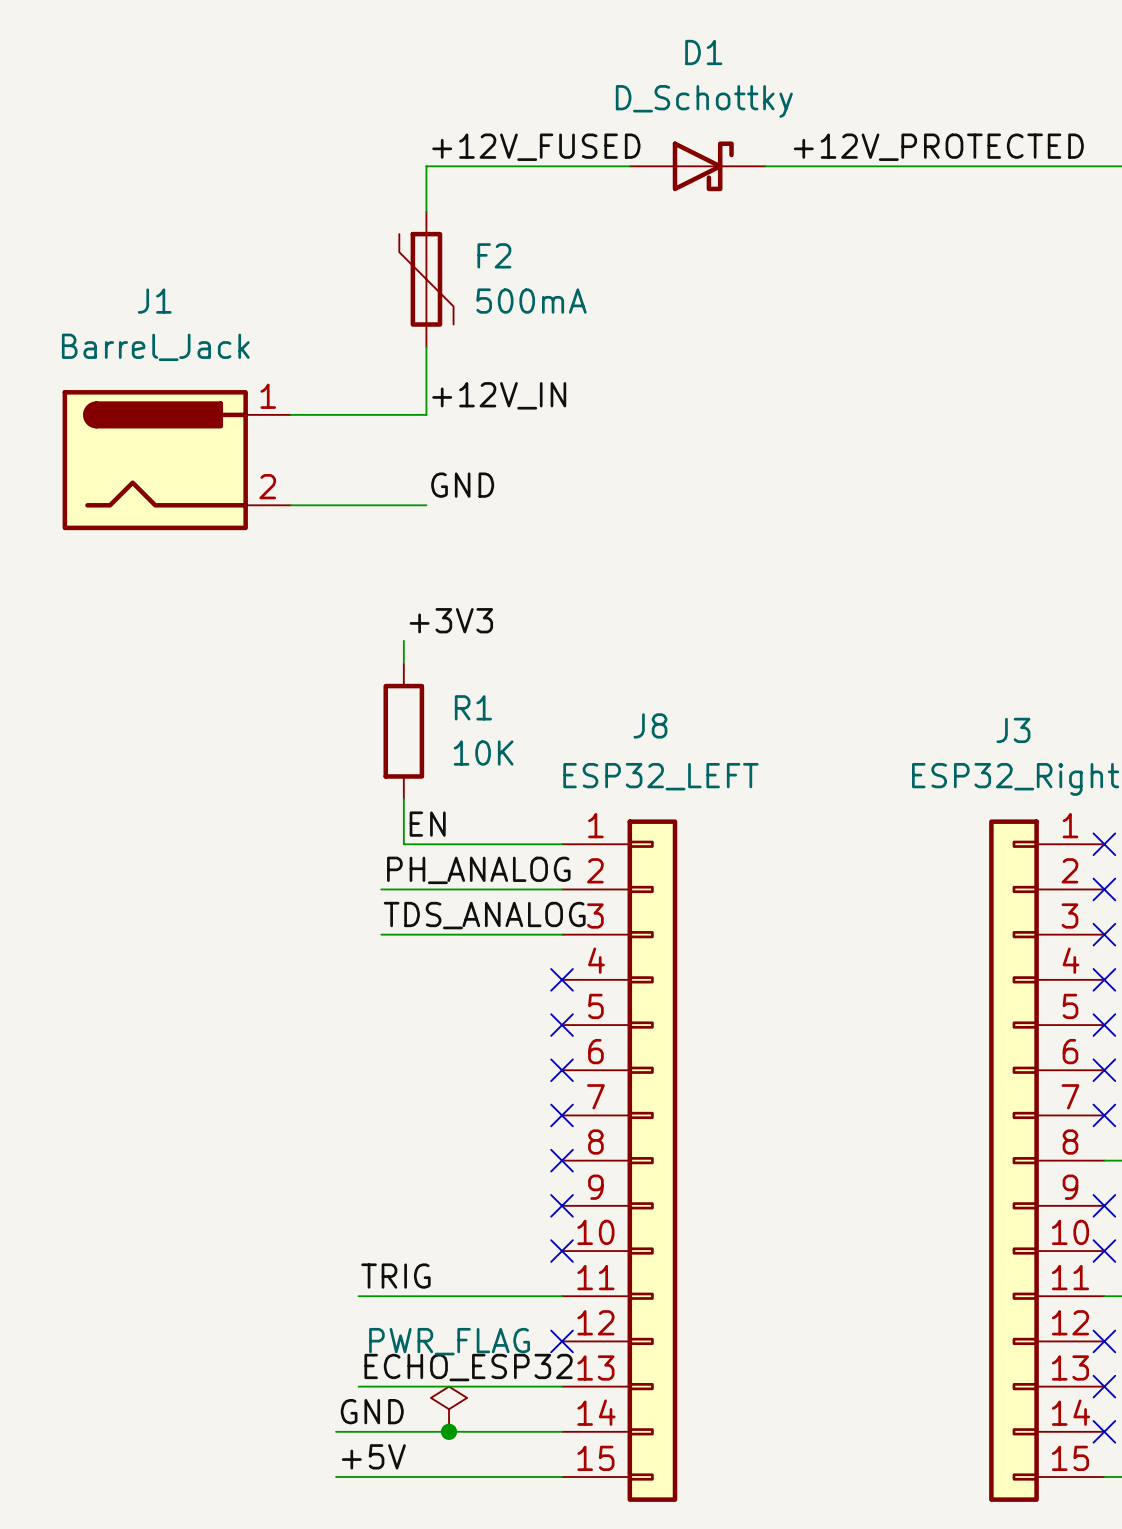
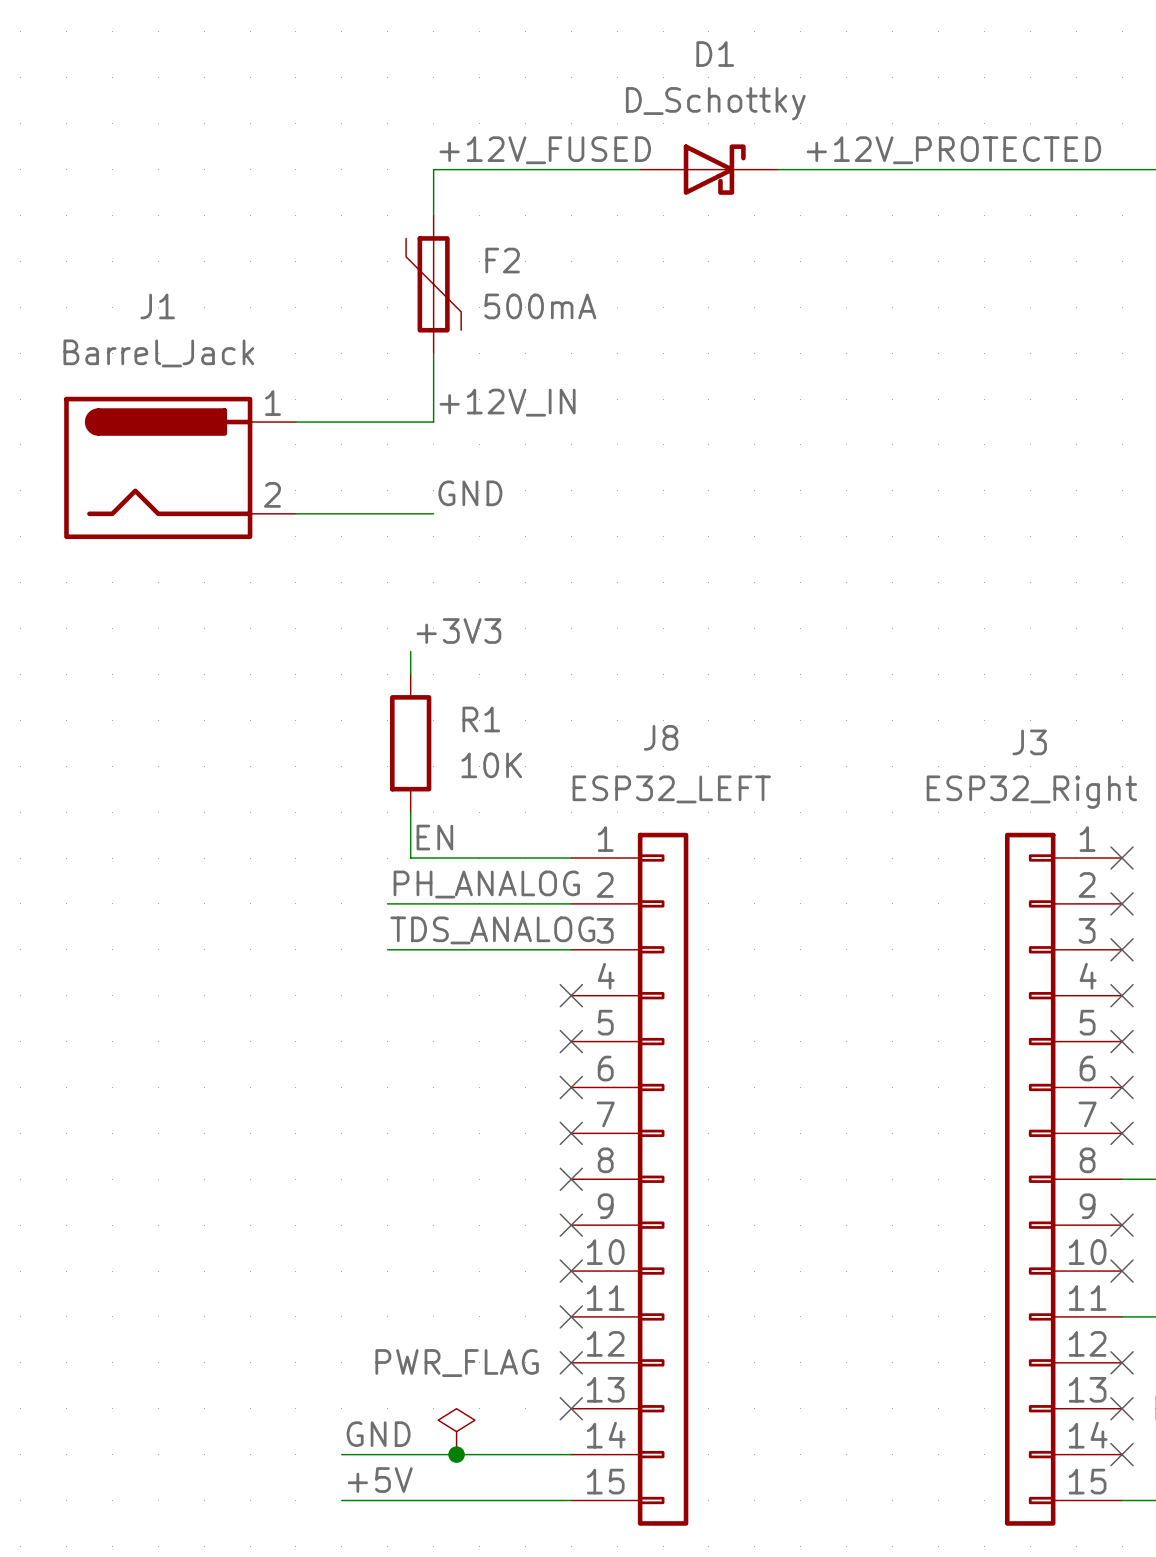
label: TRIG (395, 1276) -> none
wire: (358, 1296) (562, 1296) -> none
no-connect mark: none -> (571, 1316)
label: ECHO_ESP32 (468, 1367) -> none
wire: (358, 1386) (562, 1386) -> none
no-connect mark: none -> (571, 1408)

